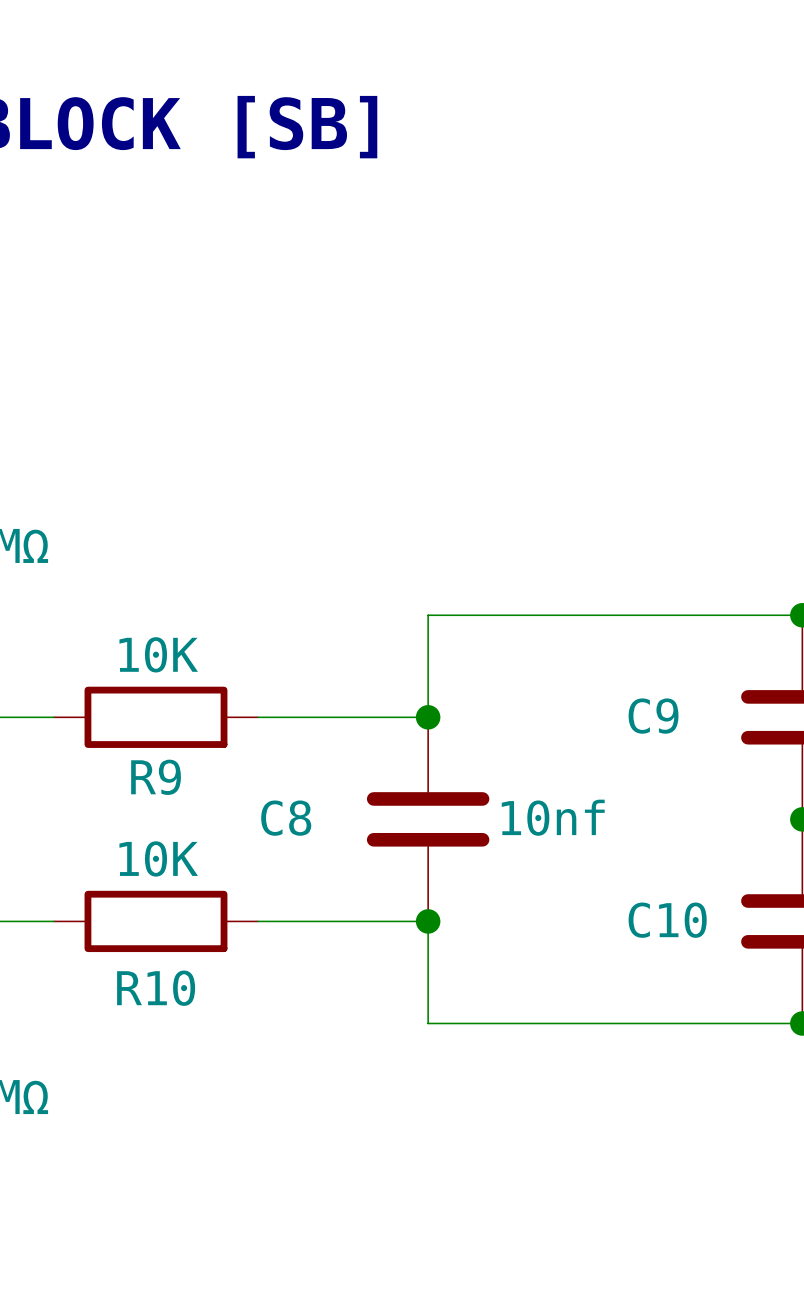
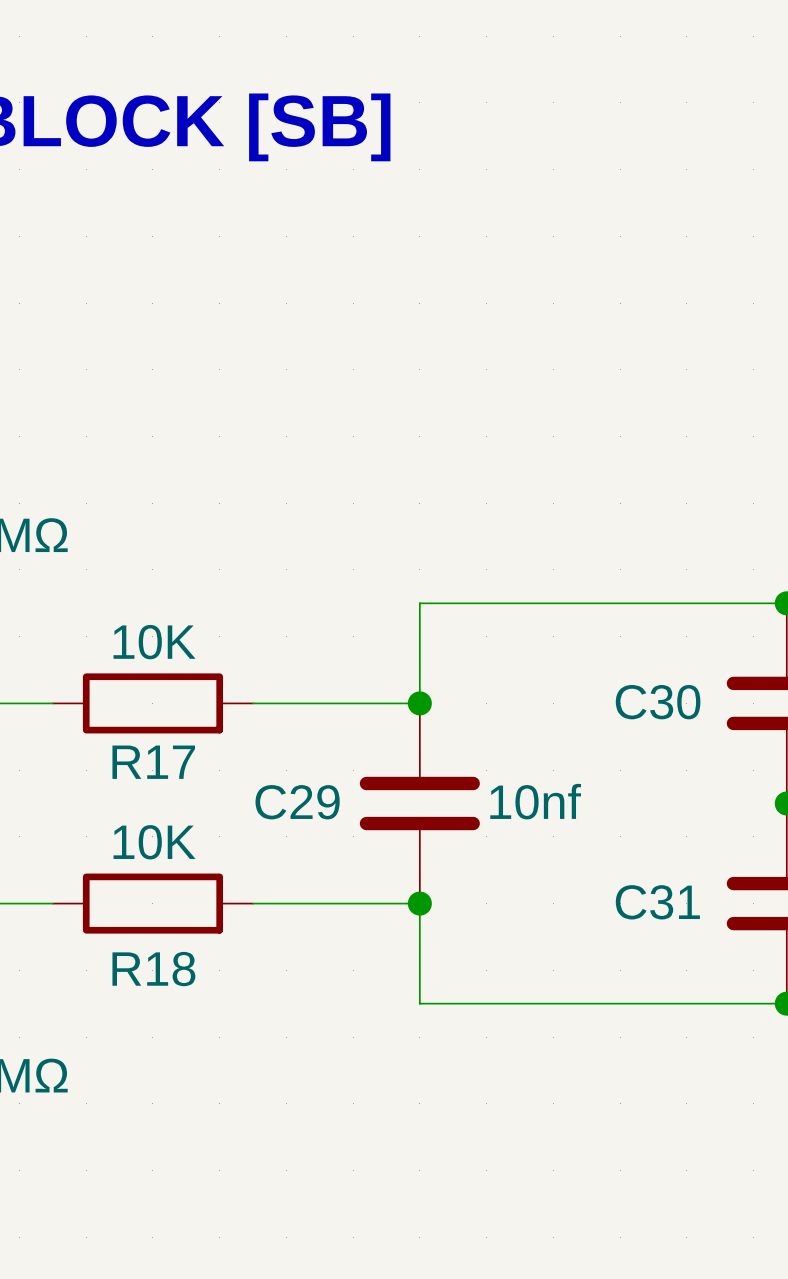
C9 name: C9 (653, 716) -> C30 (658, 702)
R9 name: R9 (156, 777) -> R17 (153, 762)
C8 name: C8 (286, 818) -> C29 (297, 802)
C10 name: C10 (667, 920) -> C31 (657, 902)
R10 name: R10 (156, 988) -> R18 (153, 969)

